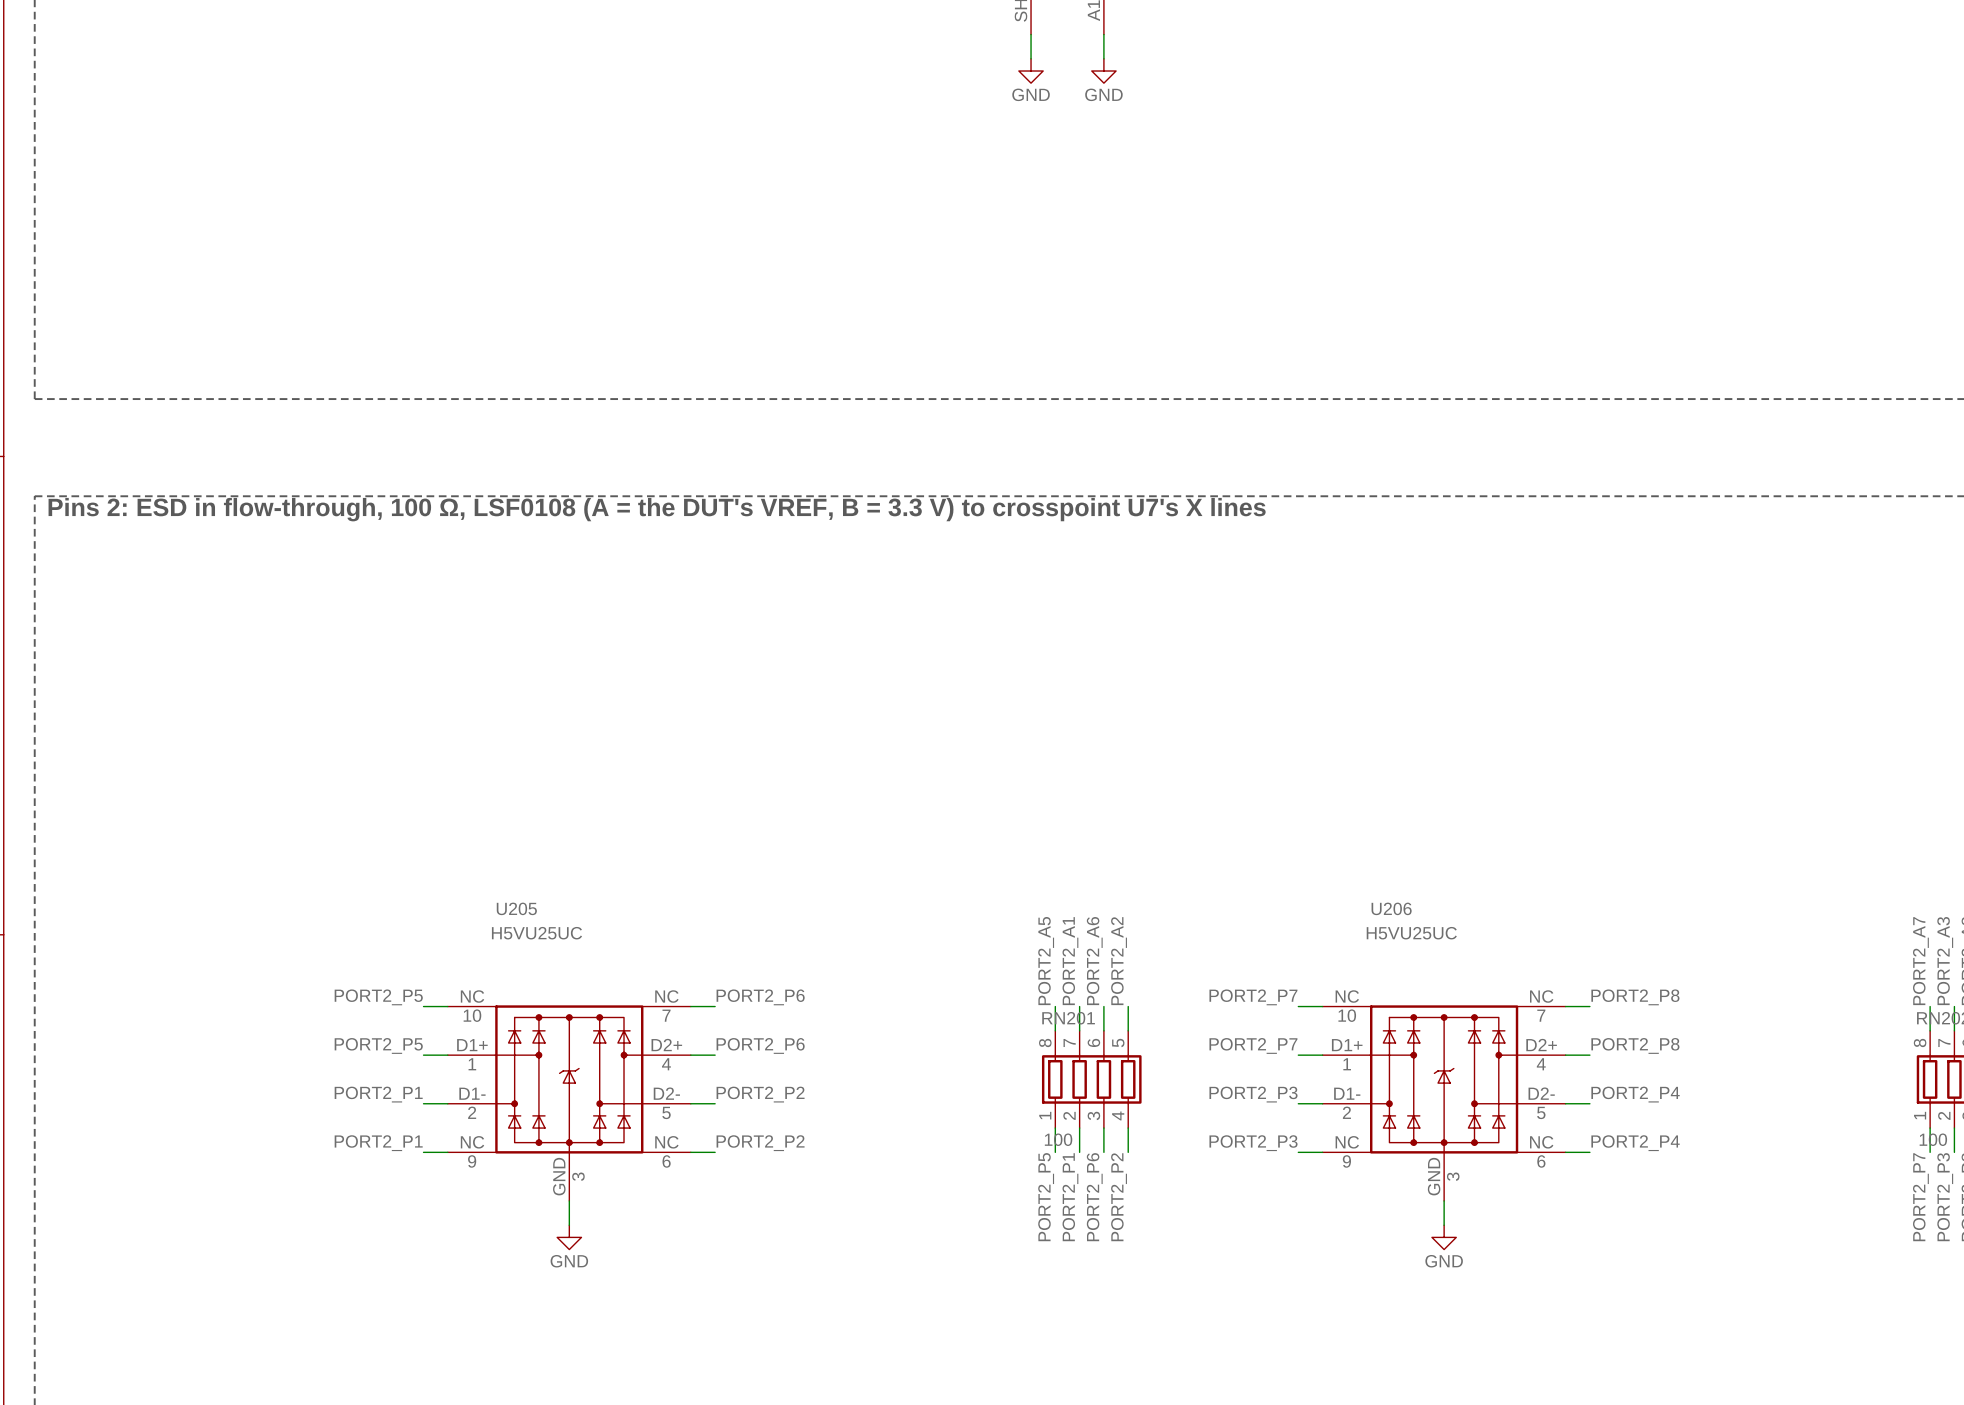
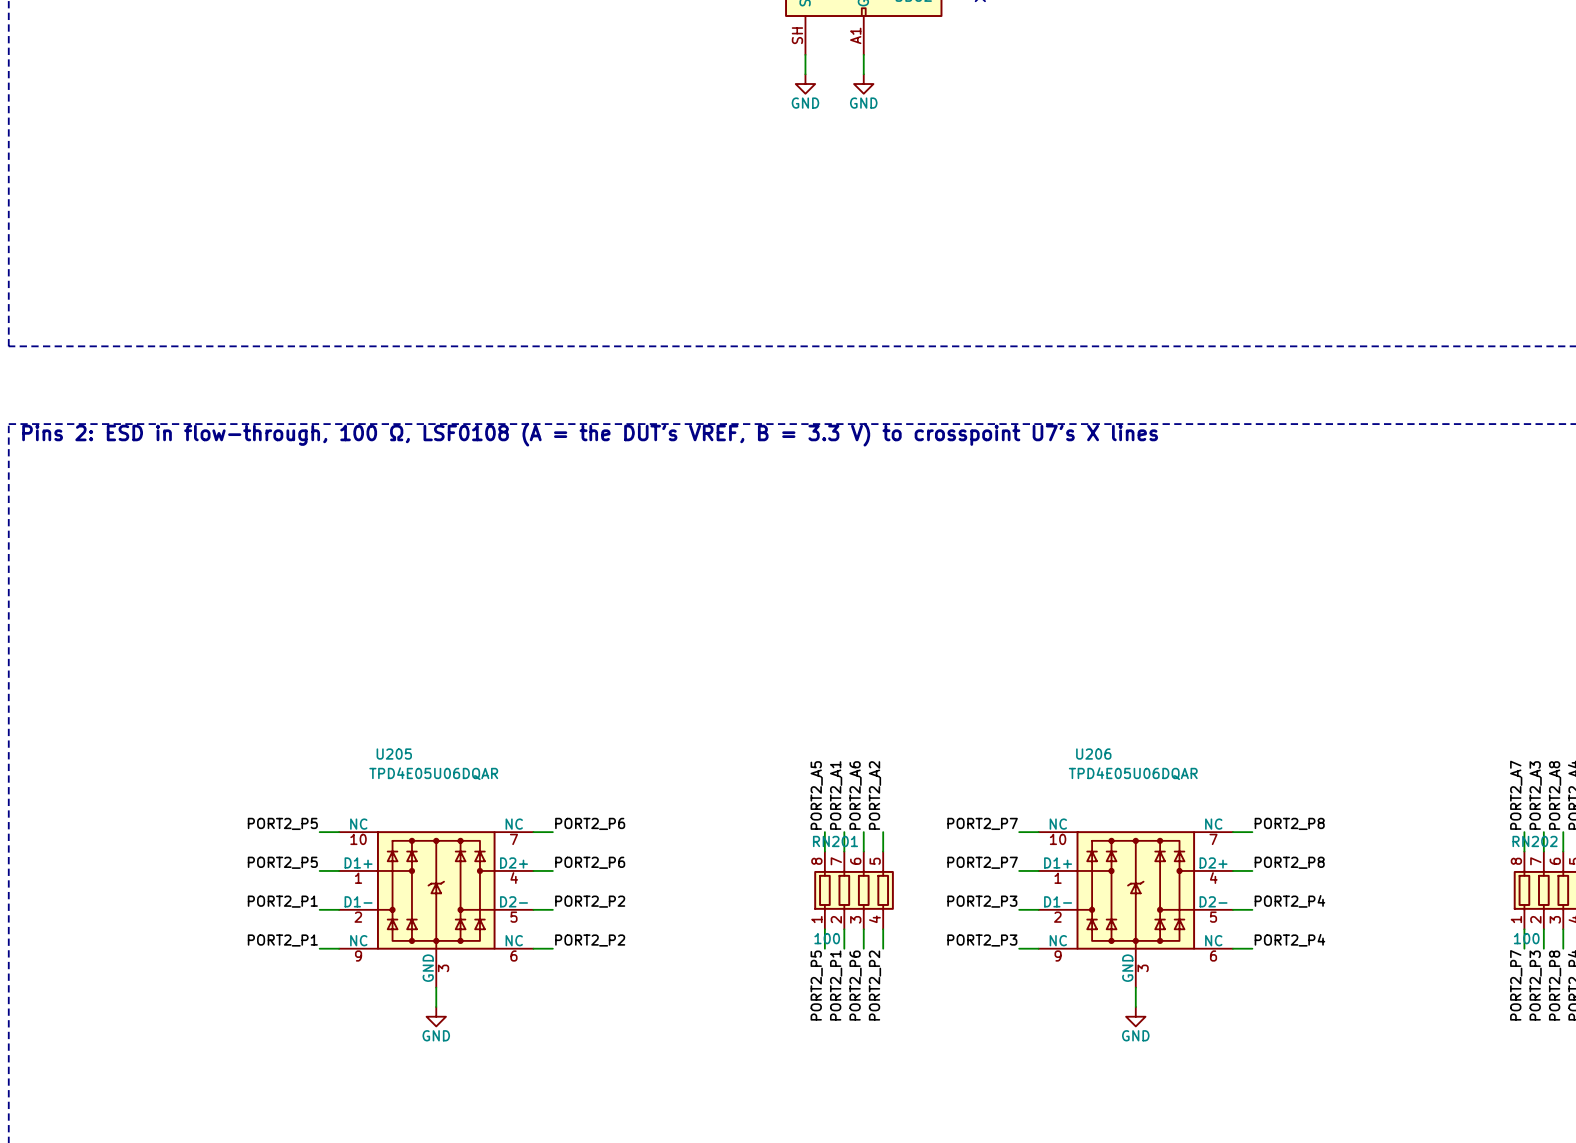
U205 value: H5VU25UC (536, 933) -> TPD4E05U06DQAR (433, 773)
U206 value: H5VU25UC (1411, 933) -> TPD4E05U06DQAR (1133, 773)

